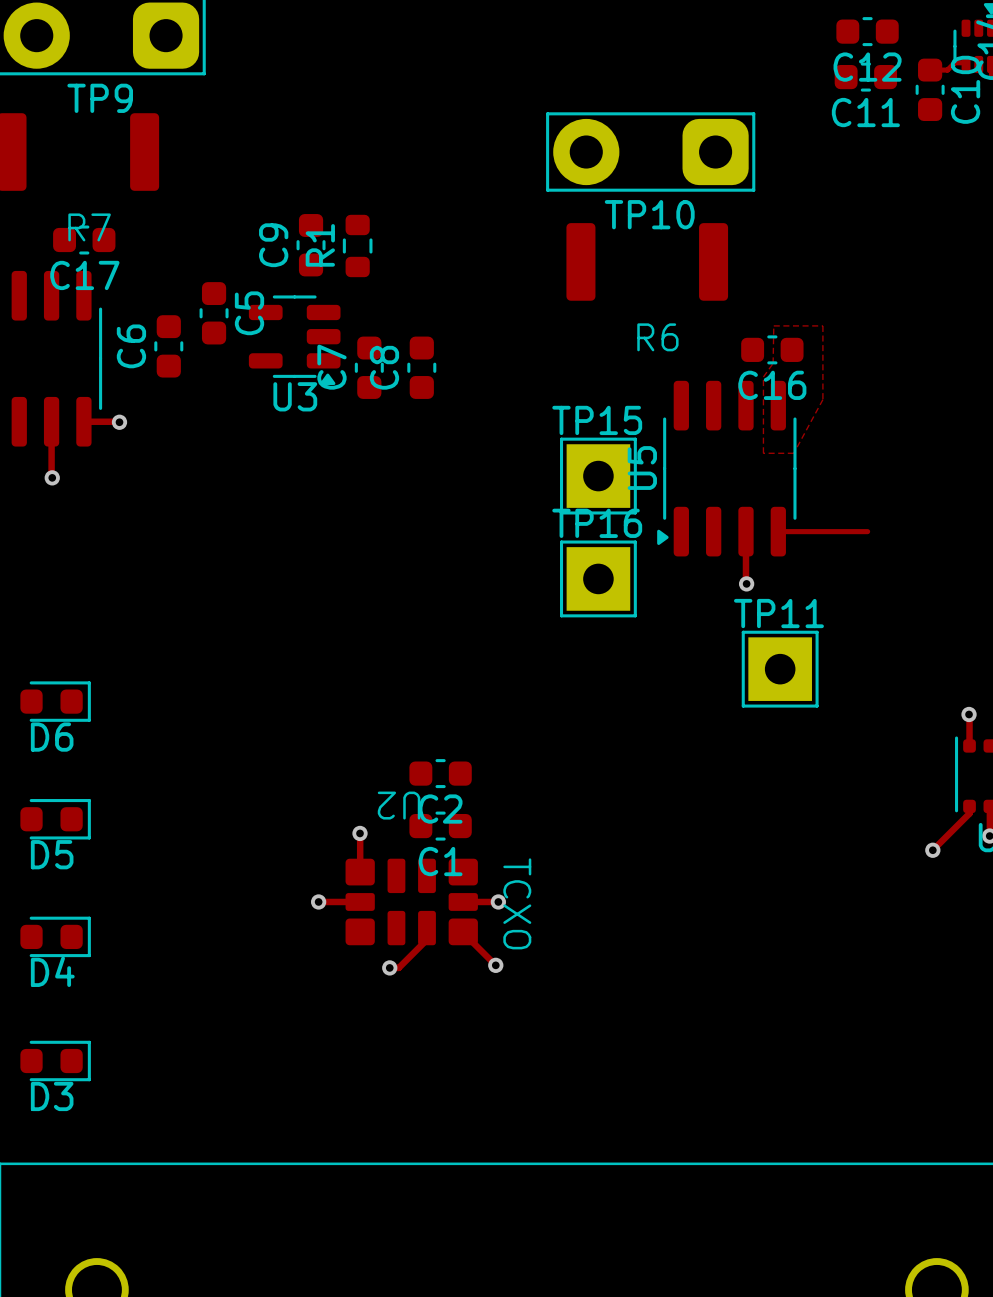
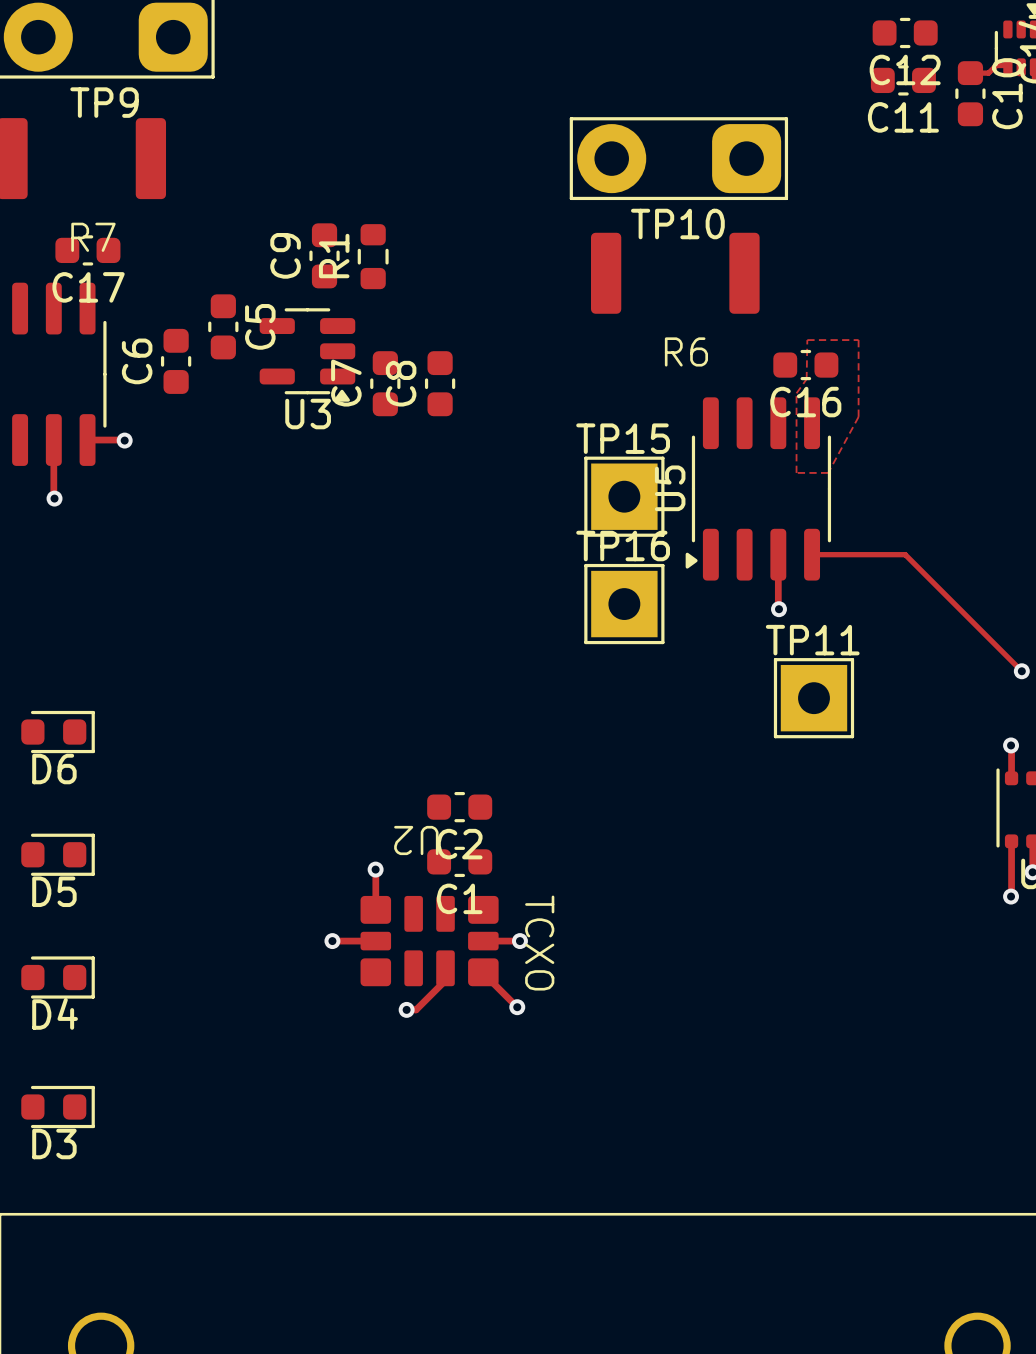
track: none -> (905, 554) (1021, 671)
via: none -> (1021, 671)
track: (969, 813) (932, 850) -> (1011, 848) (1011, 896)
via: (932, 850) -> none
via: none -> (1011, 896)

